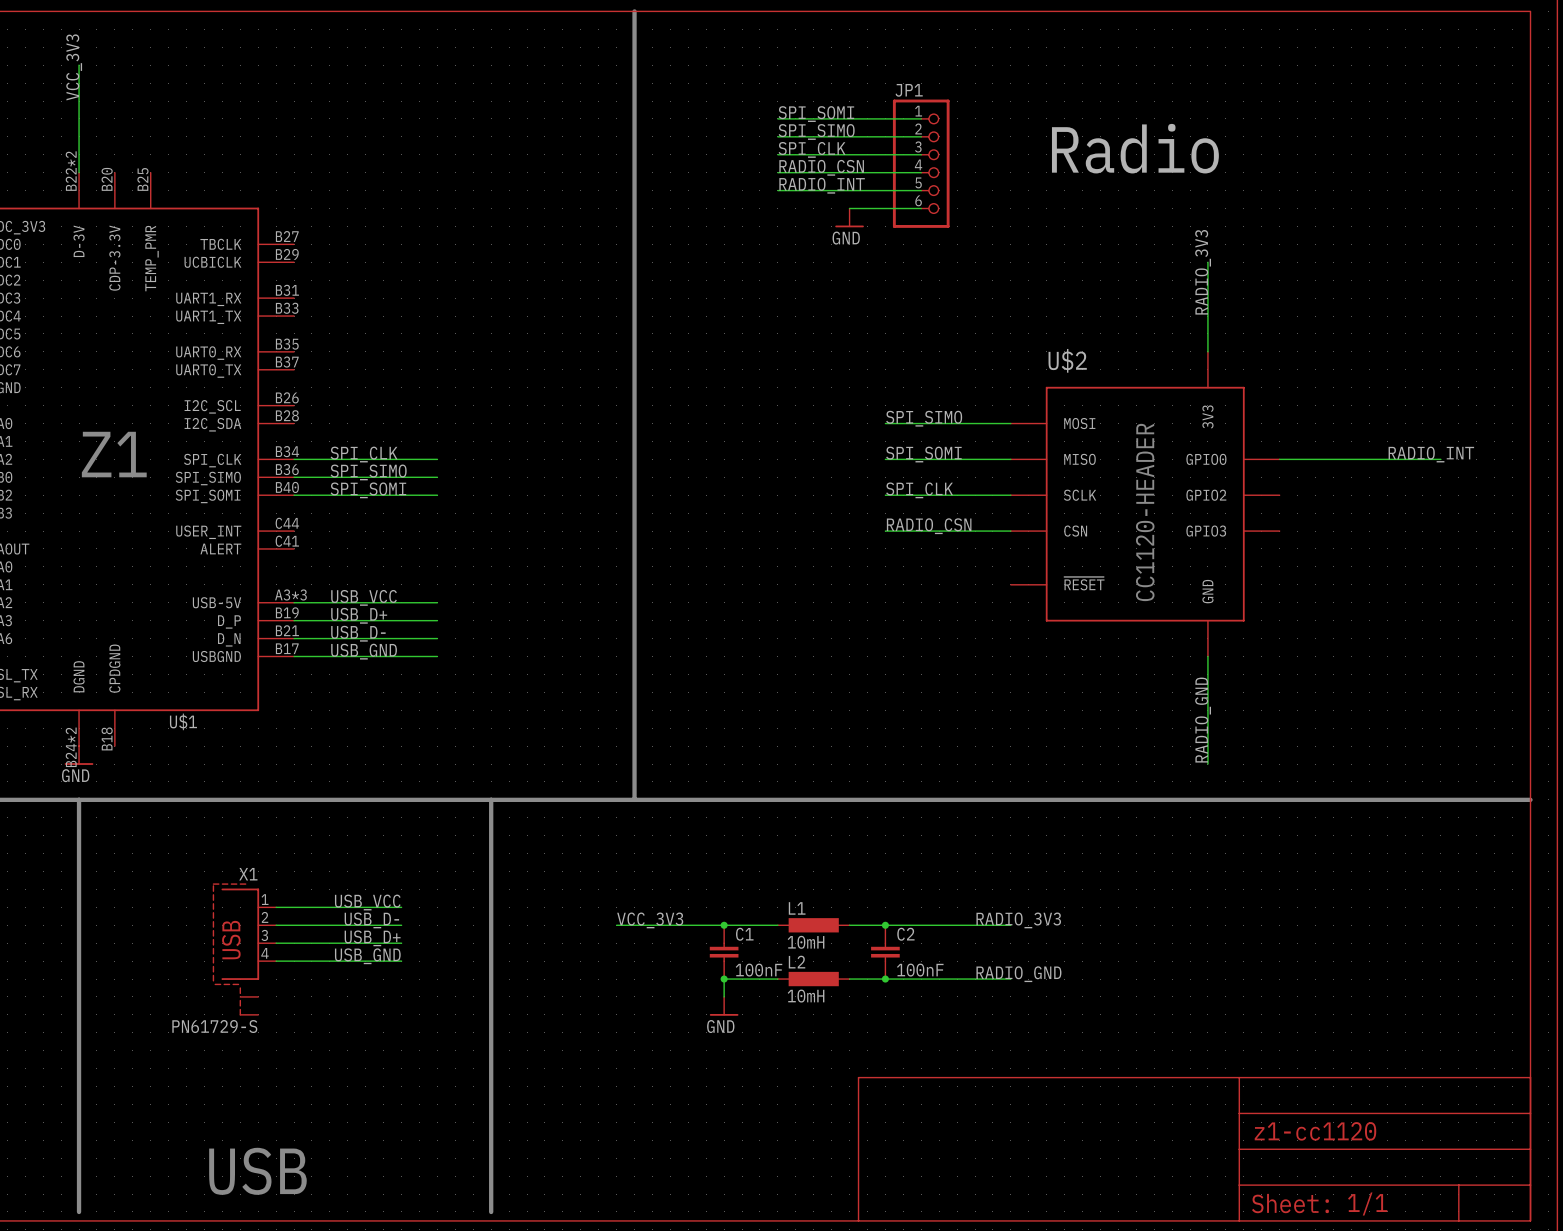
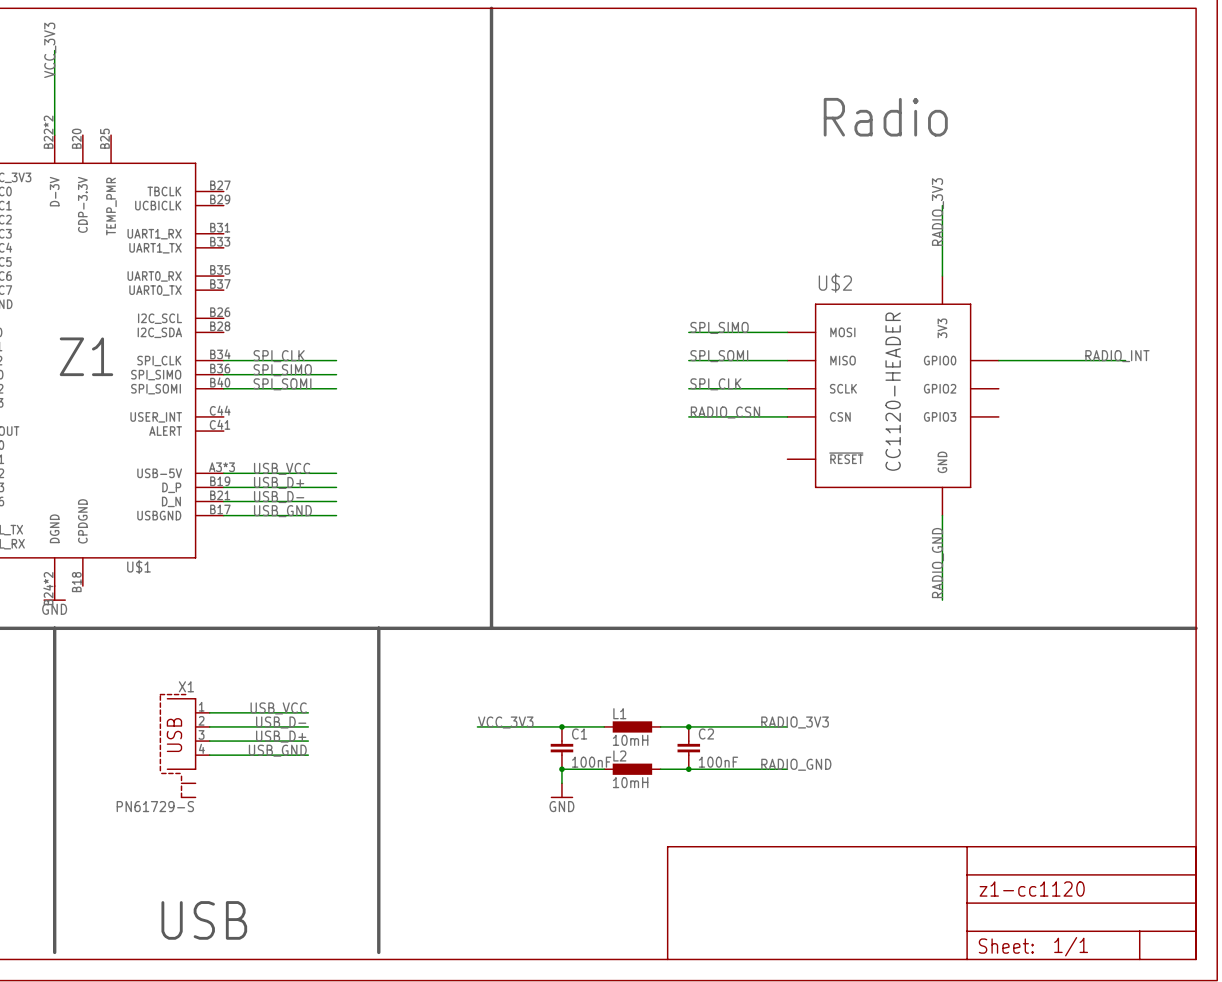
label: SPI_SOMI (816, 114) -> none
wire: (777, 118) (921, 118) -> none
label: SPI_SIMO (816, 131) -> none
wire: (777, 136) (921, 136) -> none
label: SPI_CLK (812, 149) -> none
wire: (777, 154) (921, 154) -> none
JP1: (921, 163) -> none
label: RADIO_CSN (821, 167) -> none
wire: (777, 172) (921, 172) -> none
label: RADIO_INT (822, 185) -> none
wire: (777, 190) (921, 190) -> none
wire: (849, 208) (921, 208) -> none
power symbol: GND (849, 217) -> none

